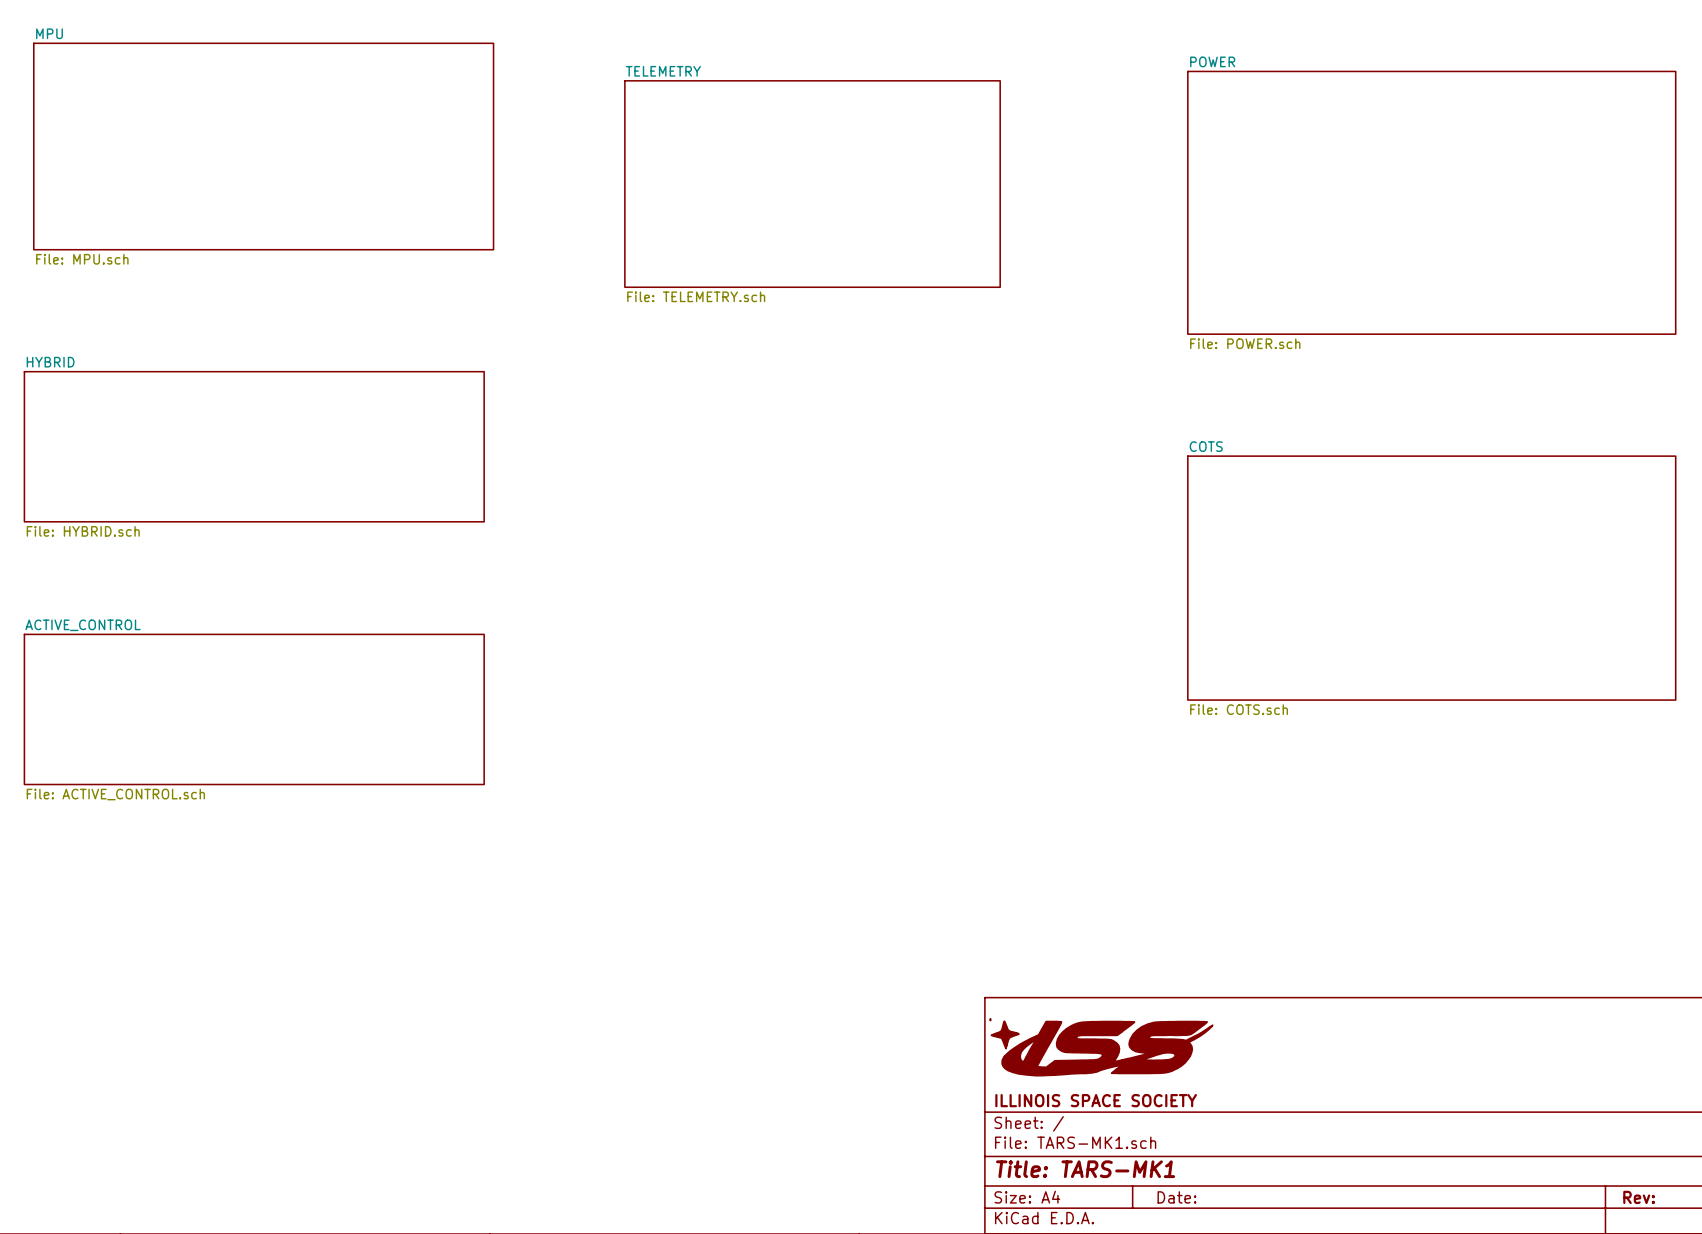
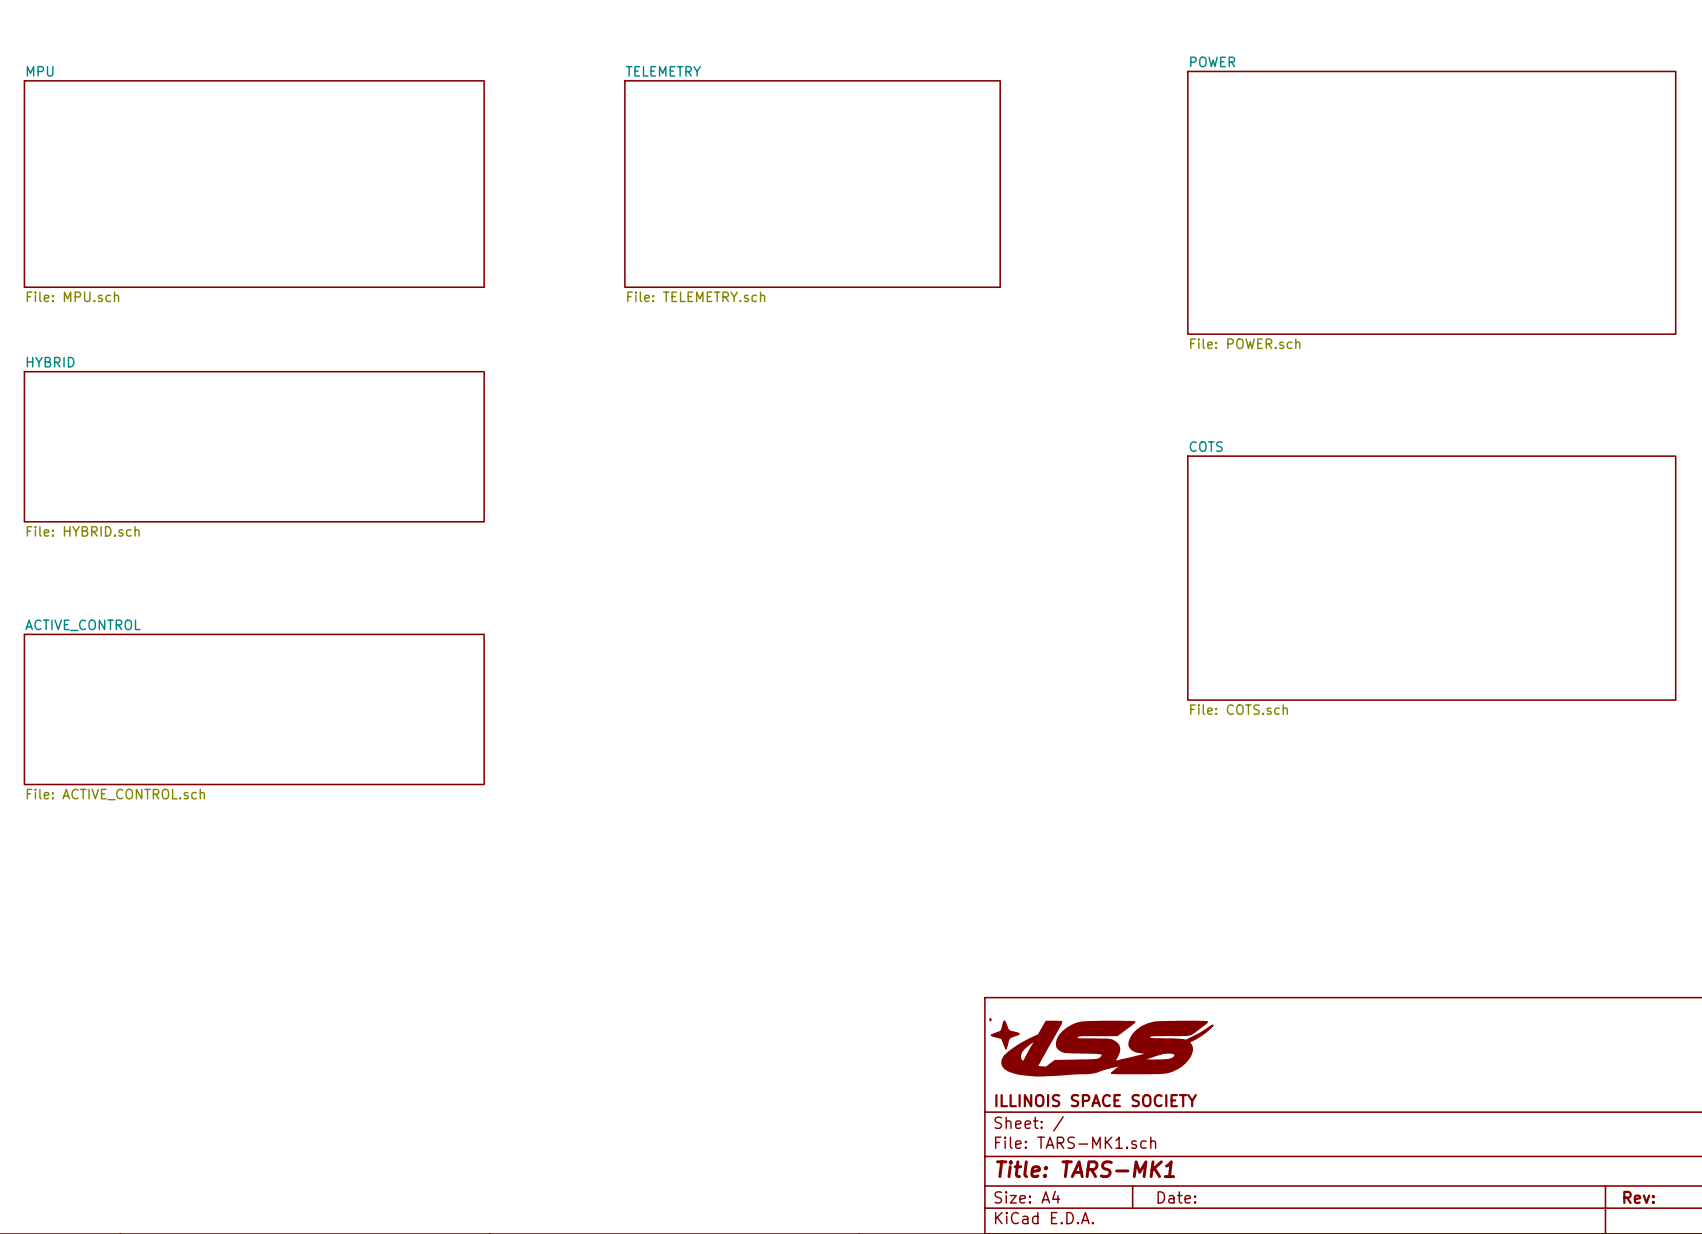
sheet MPU position: (263, 146) -> (254, 184)

